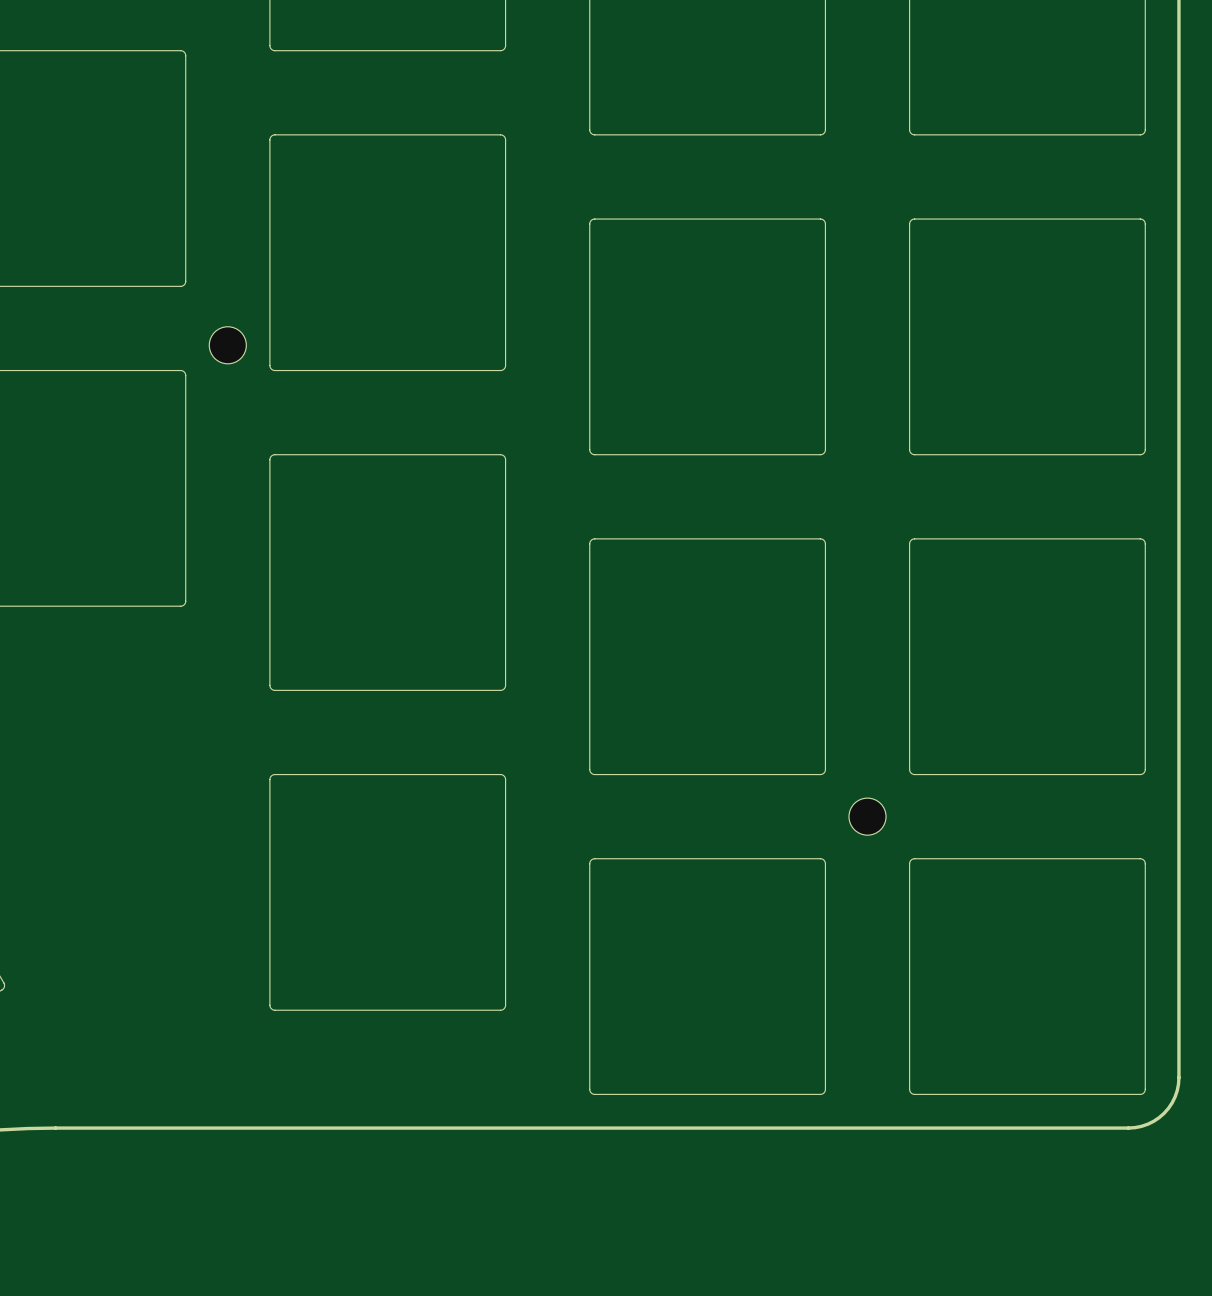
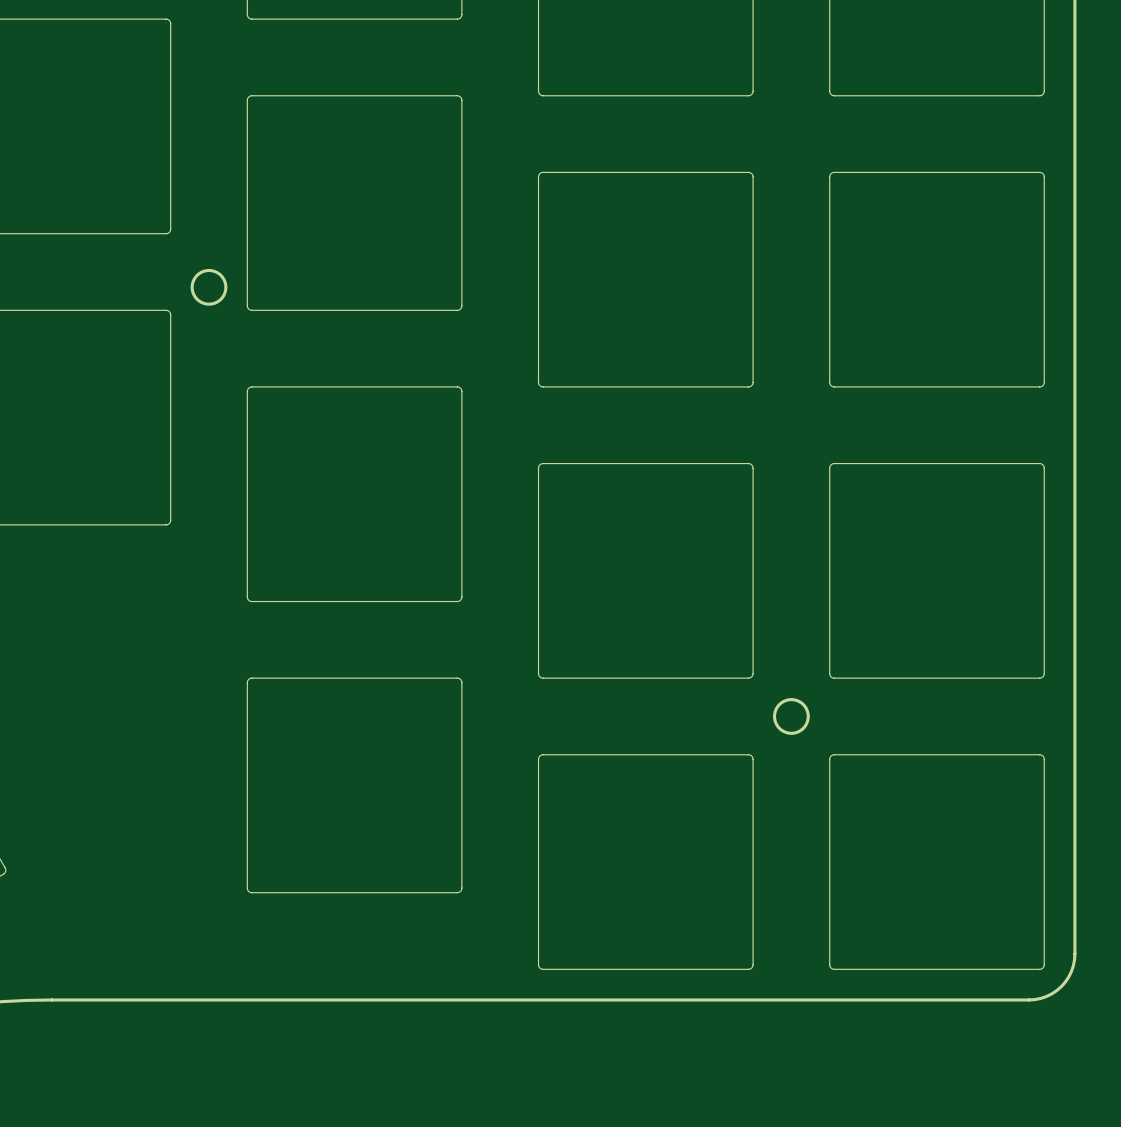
round board edge: none -> [190, 268, 228, 306]
part: (227, 345) -> none
round board edge: none -> [773, 698, 810, 735]
part: (867, 816) -> none

